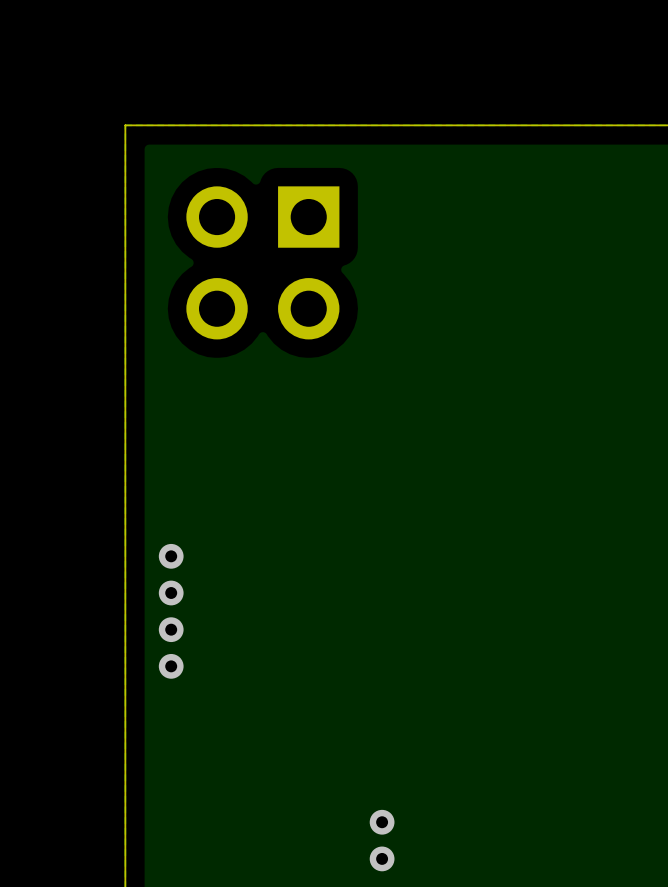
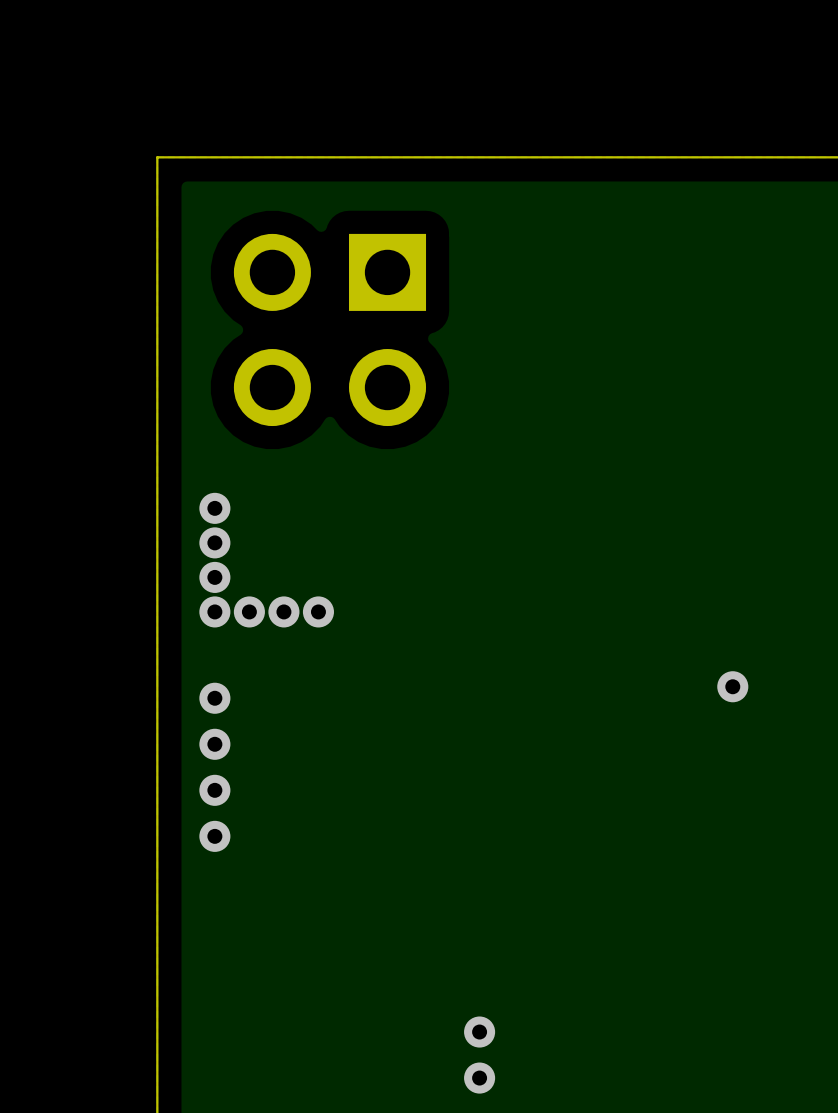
via: none -> (214, 508)
via: none -> (214, 542)
via: none -> (214, 577)
via: none -> (214, 611)
via: none -> (249, 611)
via: none -> (283, 611)
via: none -> (318, 611)
via: none -> (732, 686)

